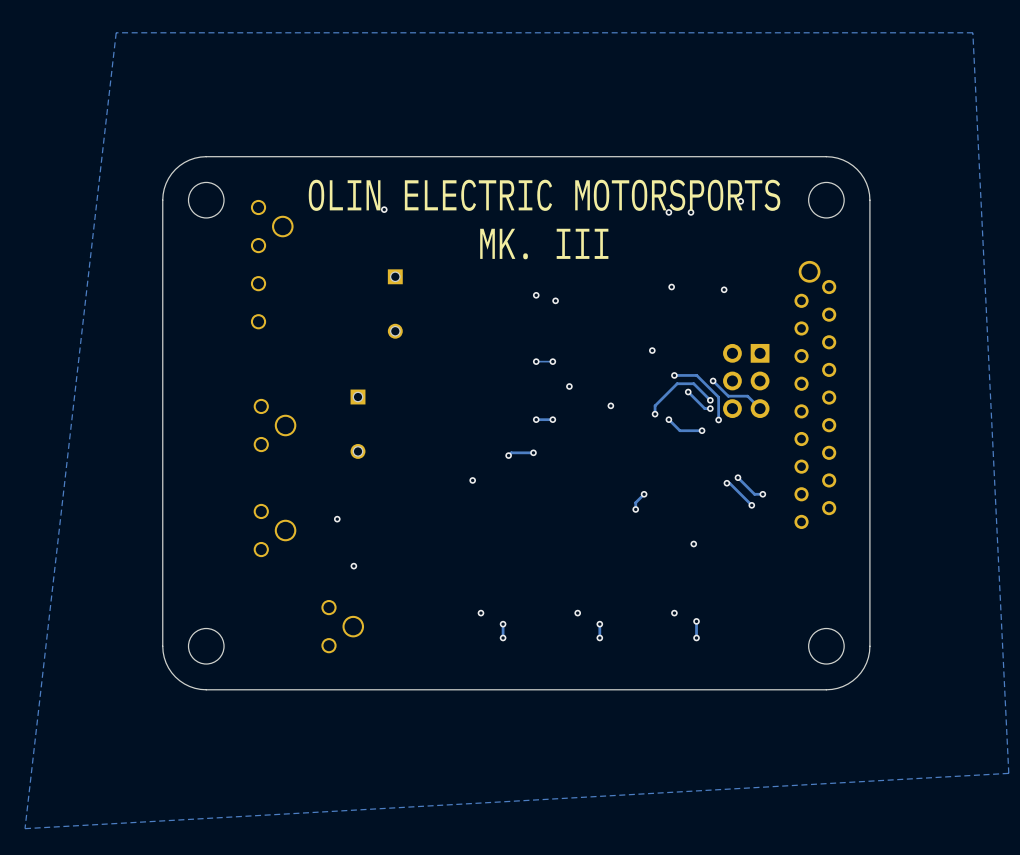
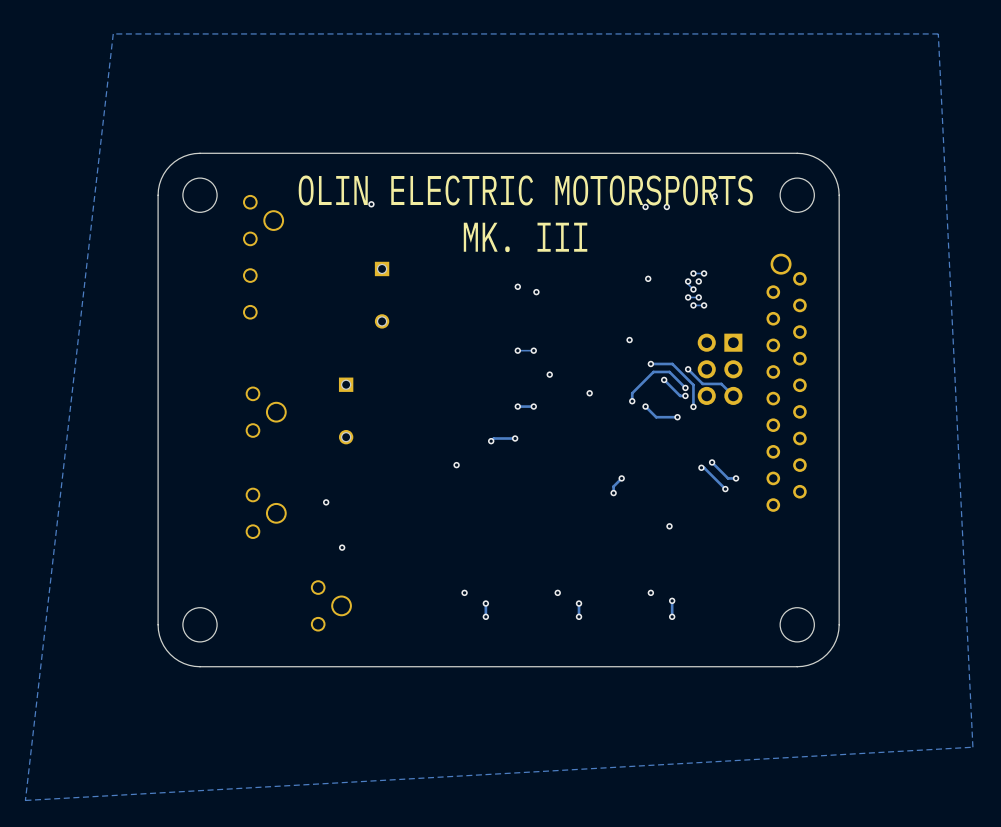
via: none -> (693, 273)
track: none -> (704, 273) (693, 273)
via: none -> (704, 273)
track: none -> (688, 281) (693, 289)
via: none -> (688, 281)
via: none -> (693, 289)
via: none -> (688, 297)
track: none -> (698, 297) (688, 297)
via: none -> (698, 297)
via: none -> (693, 305)
track: none -> (704, 305) (693, 305)
via: none -> (704, 305)

